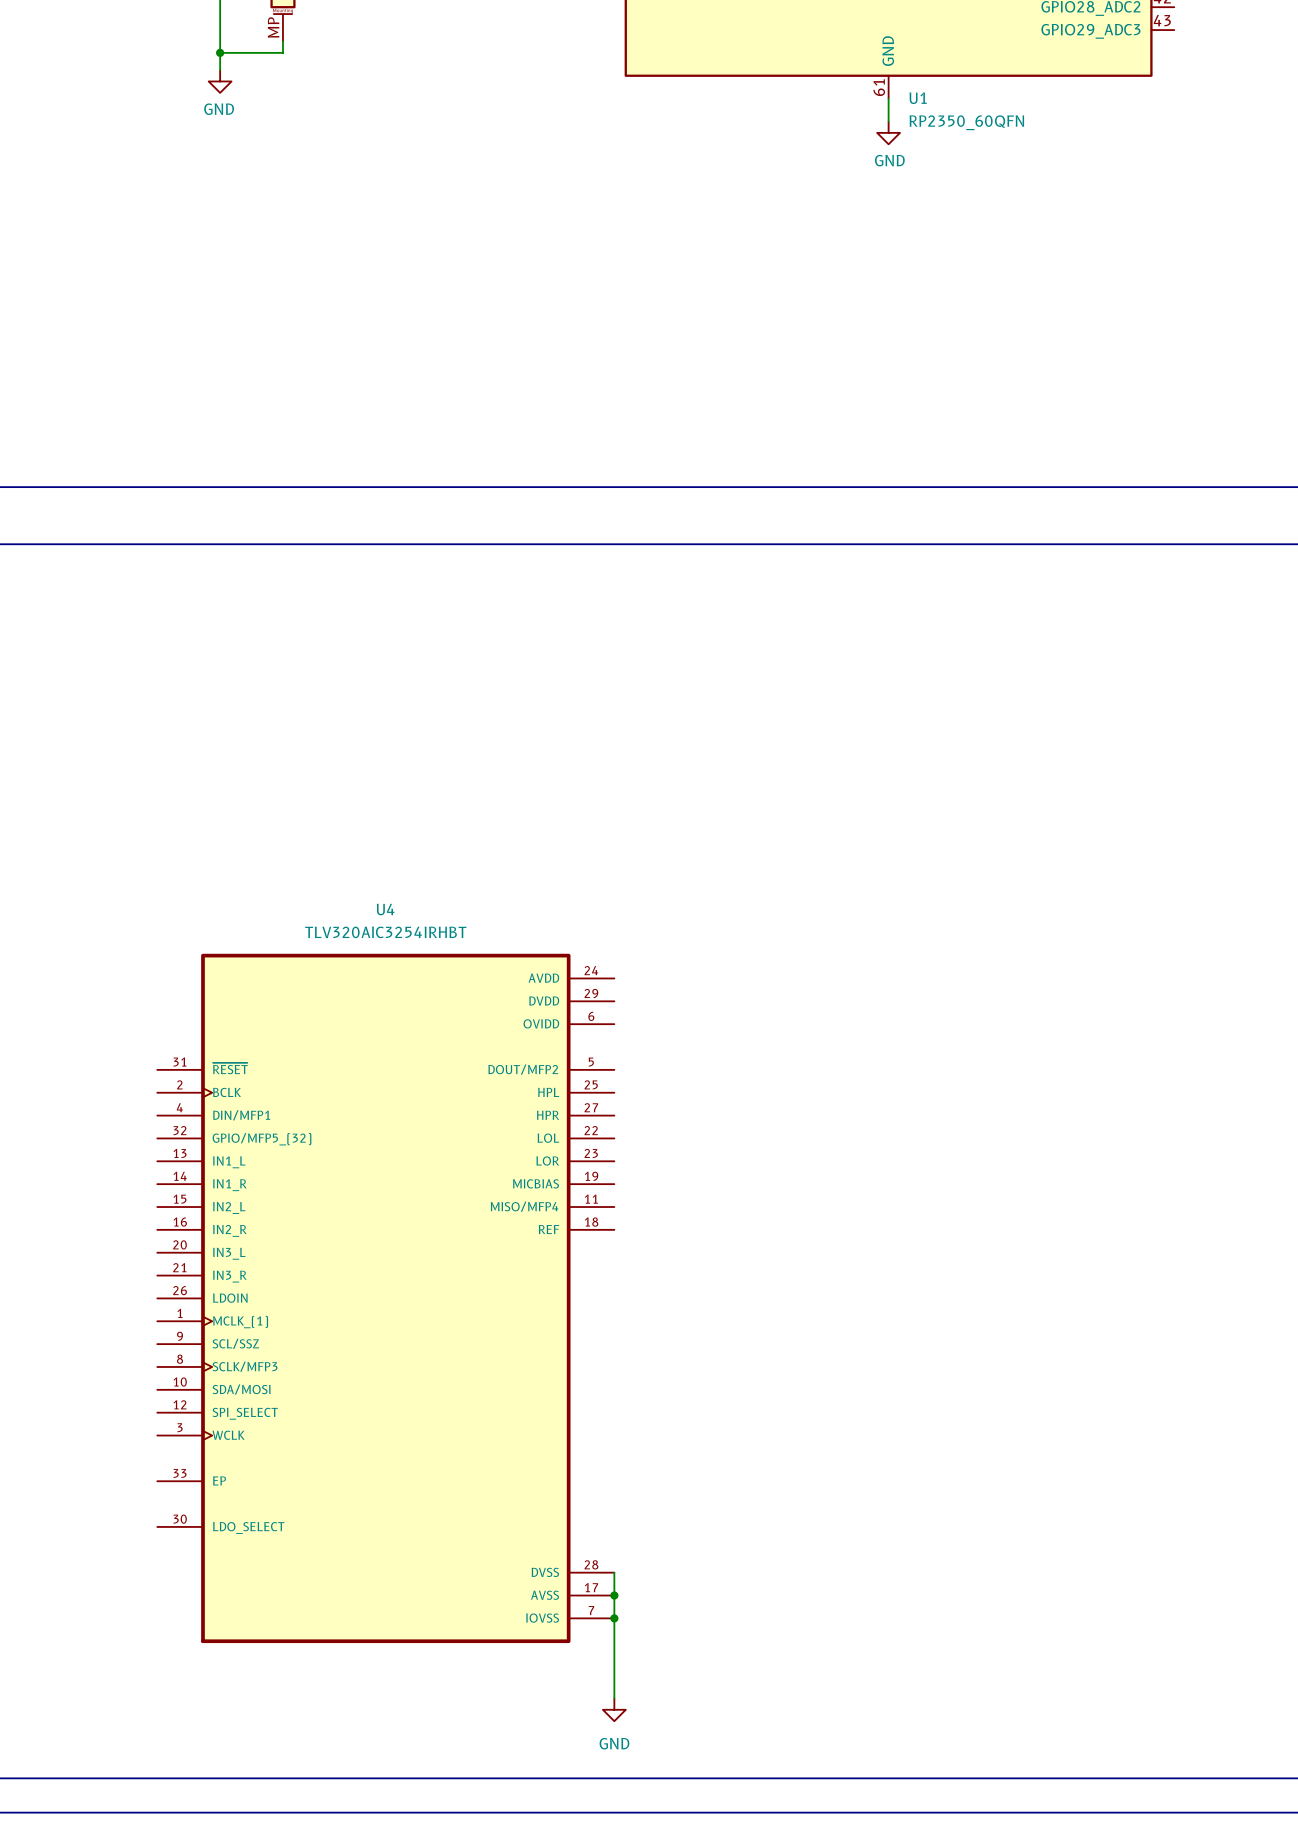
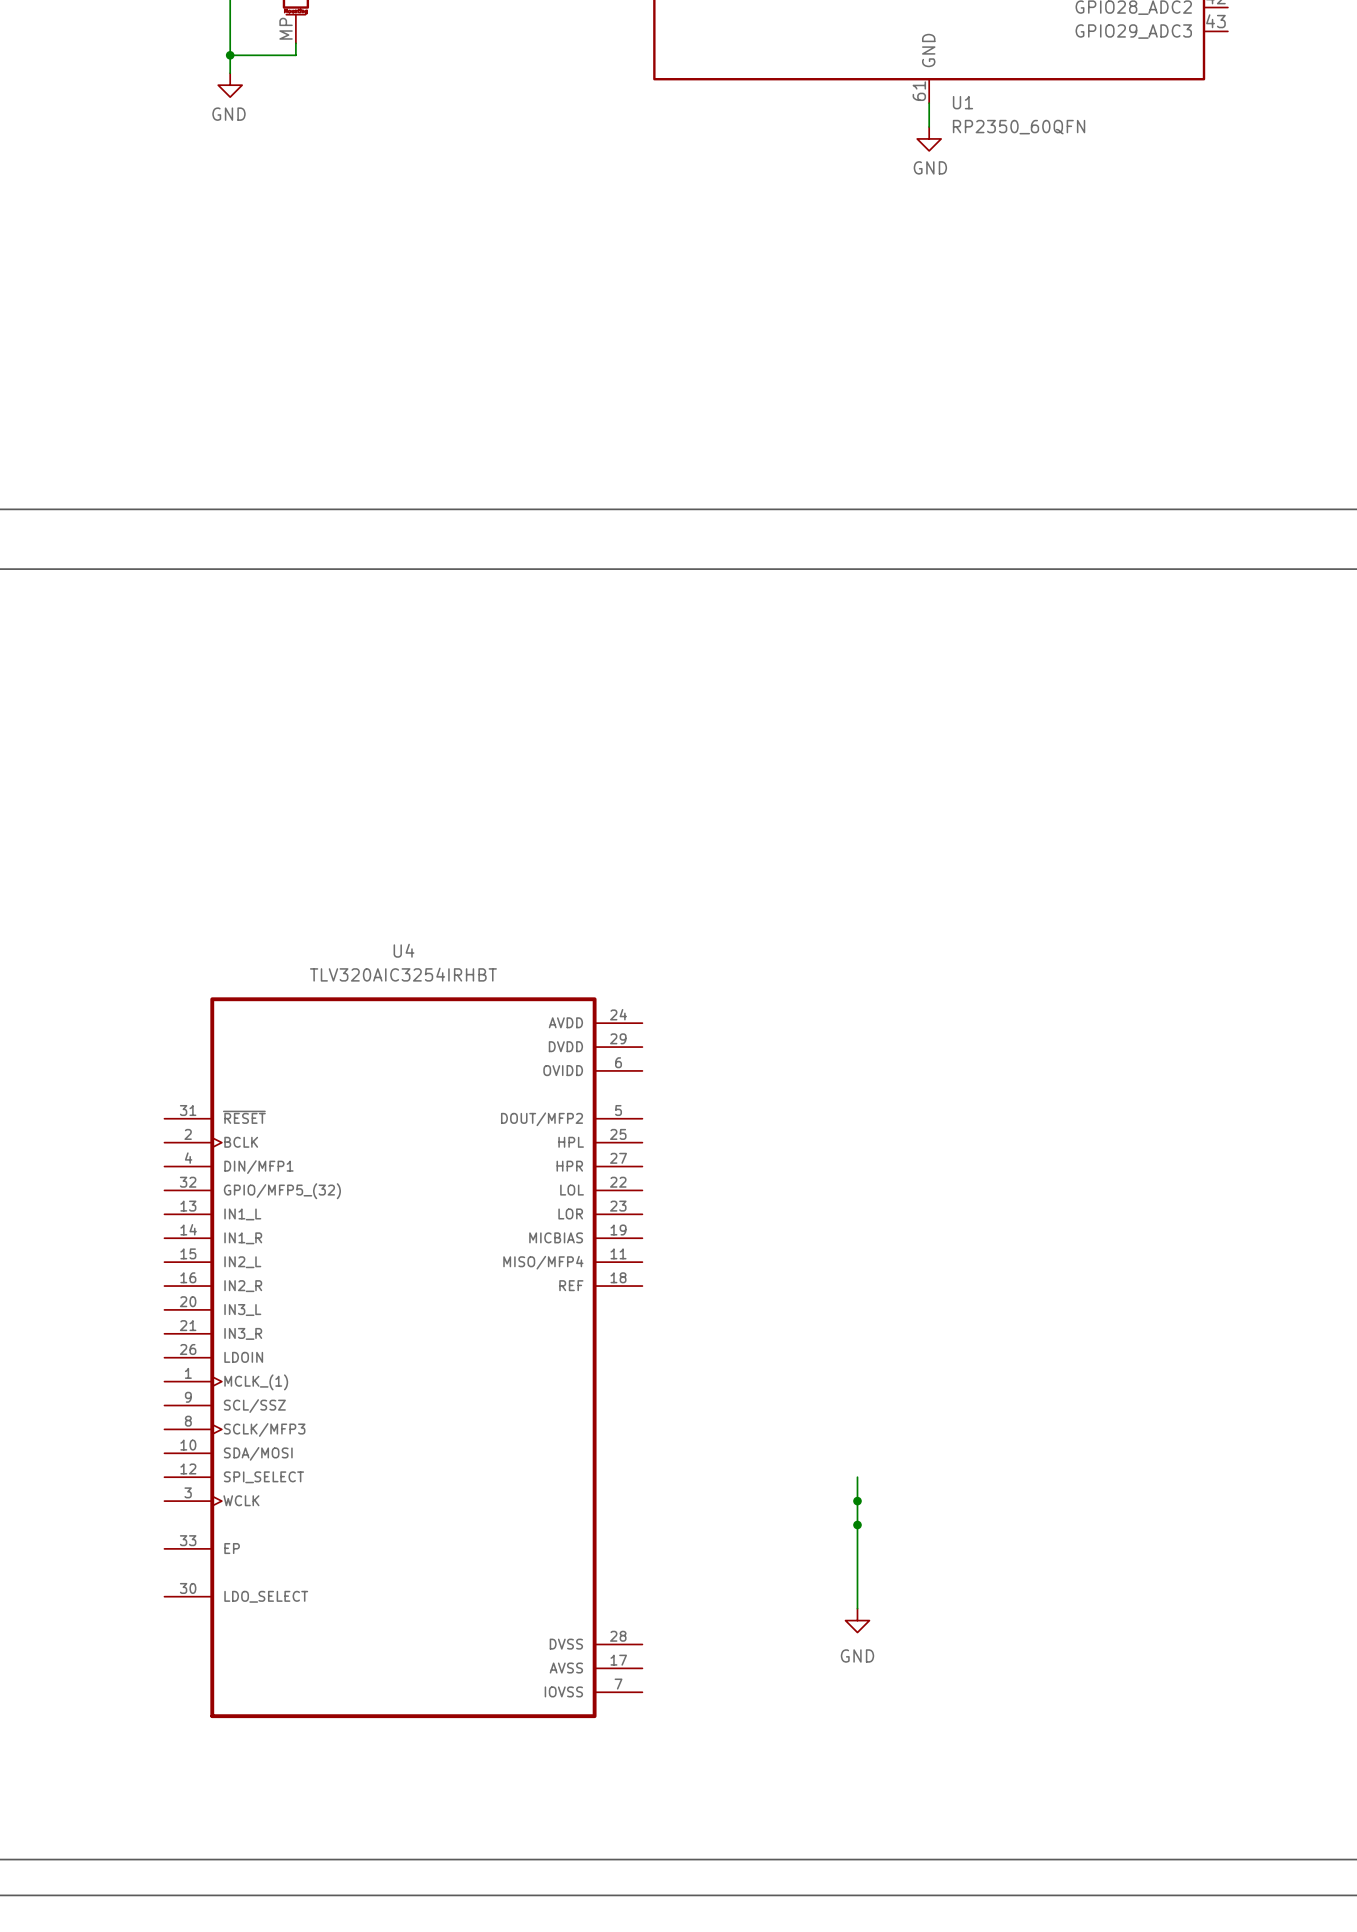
wire: none -> (857, 1477) (857, 1608)
junction: none -> (857, 1501)
junction: none -> (857, 1524)
power symbol: none -> GND (857, 1620)
wire: (614, 1572) (614, 1698) -> none
junction: (614, 1595) -> none
junction: (614, 1618) -> none
power symbol: GND (614, 1709) -> none

